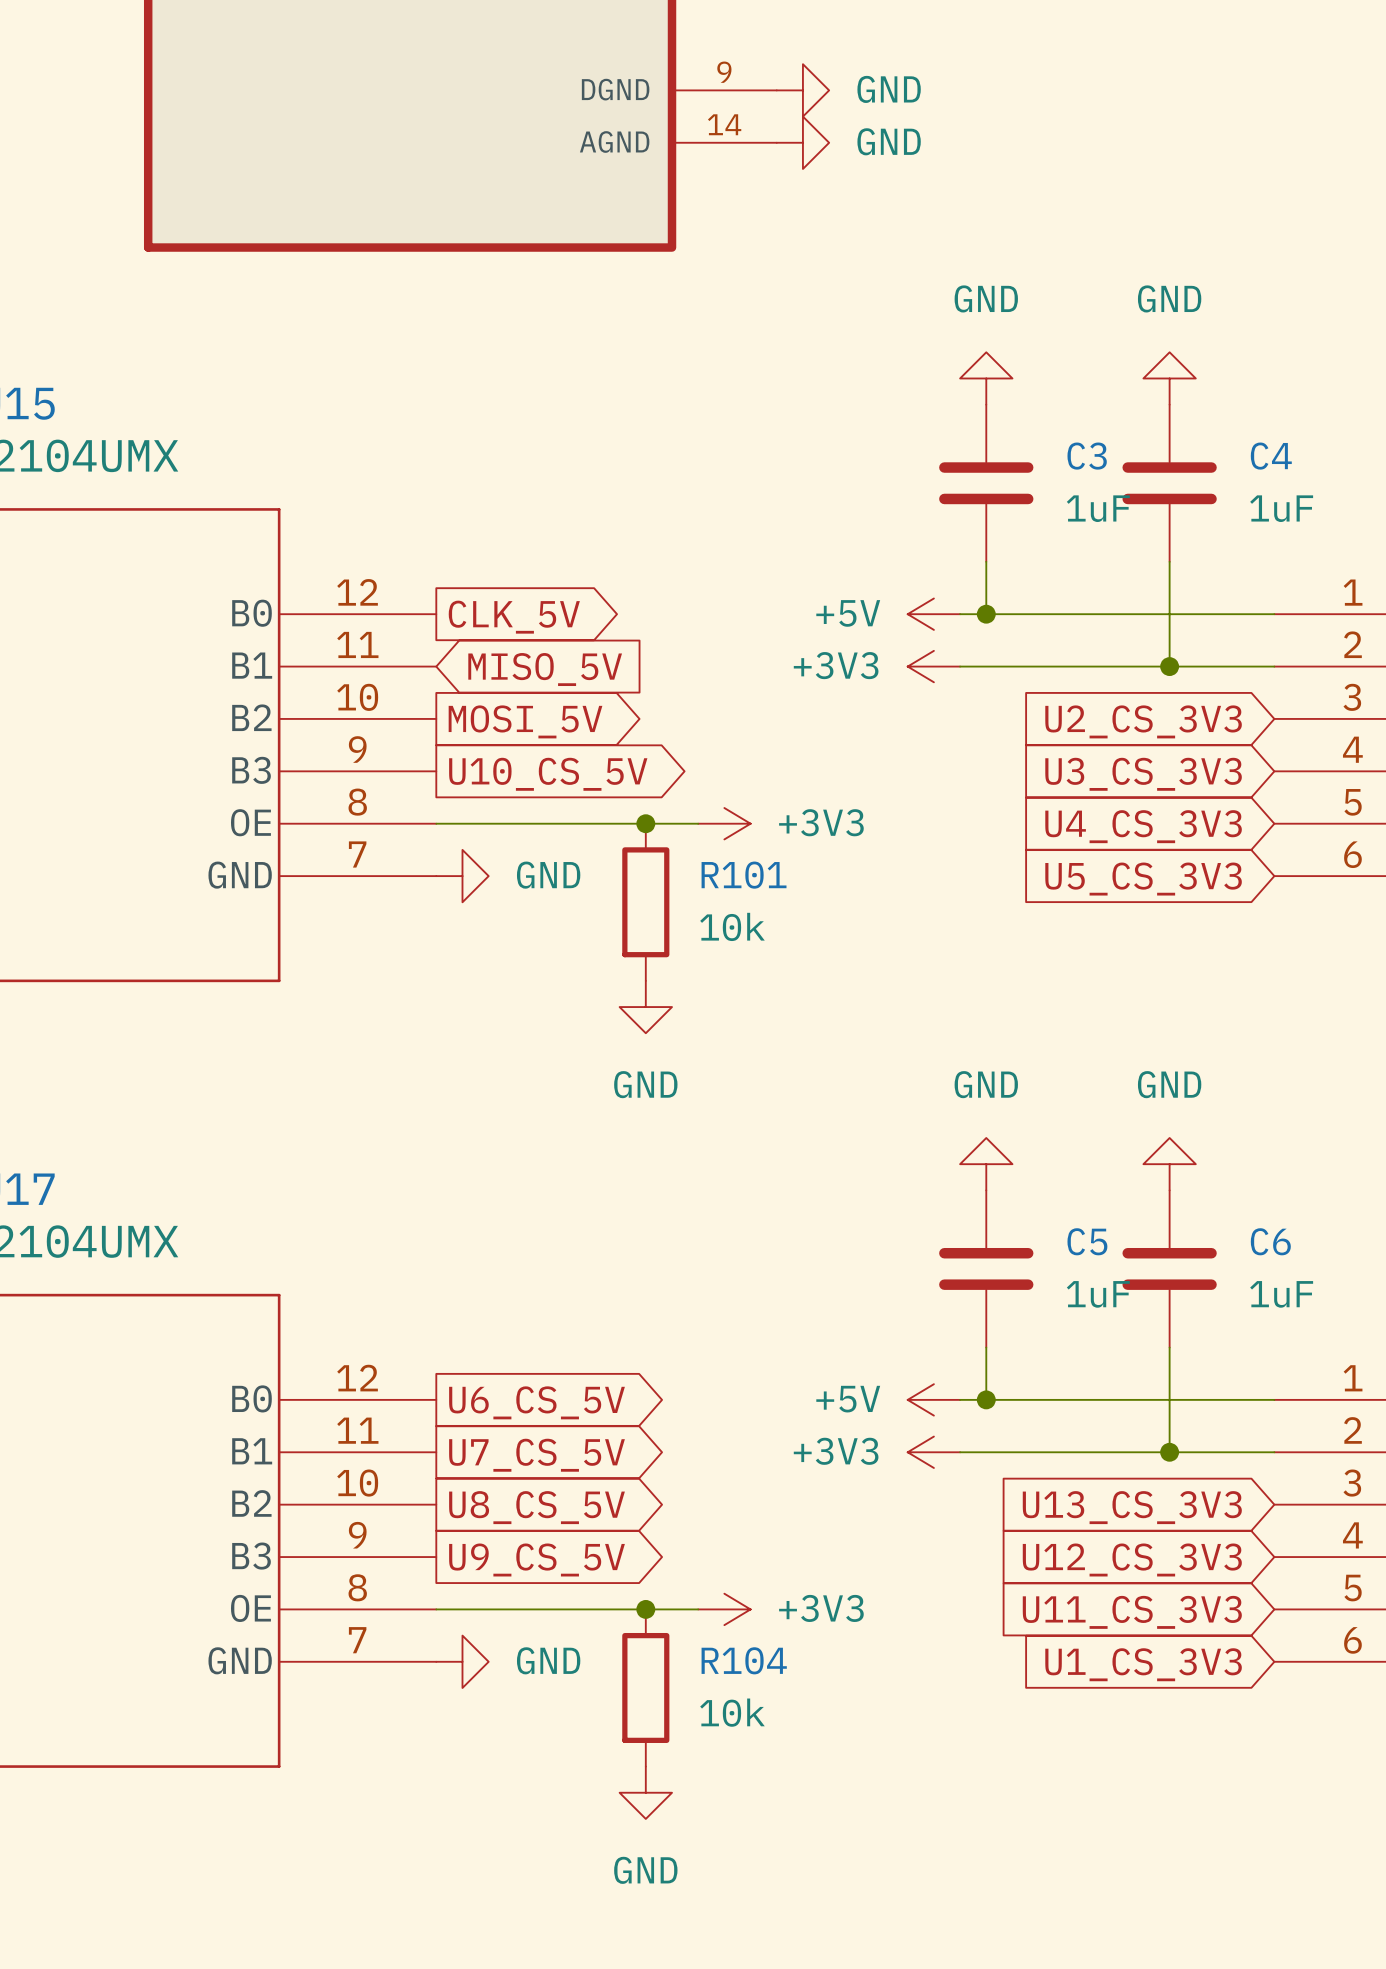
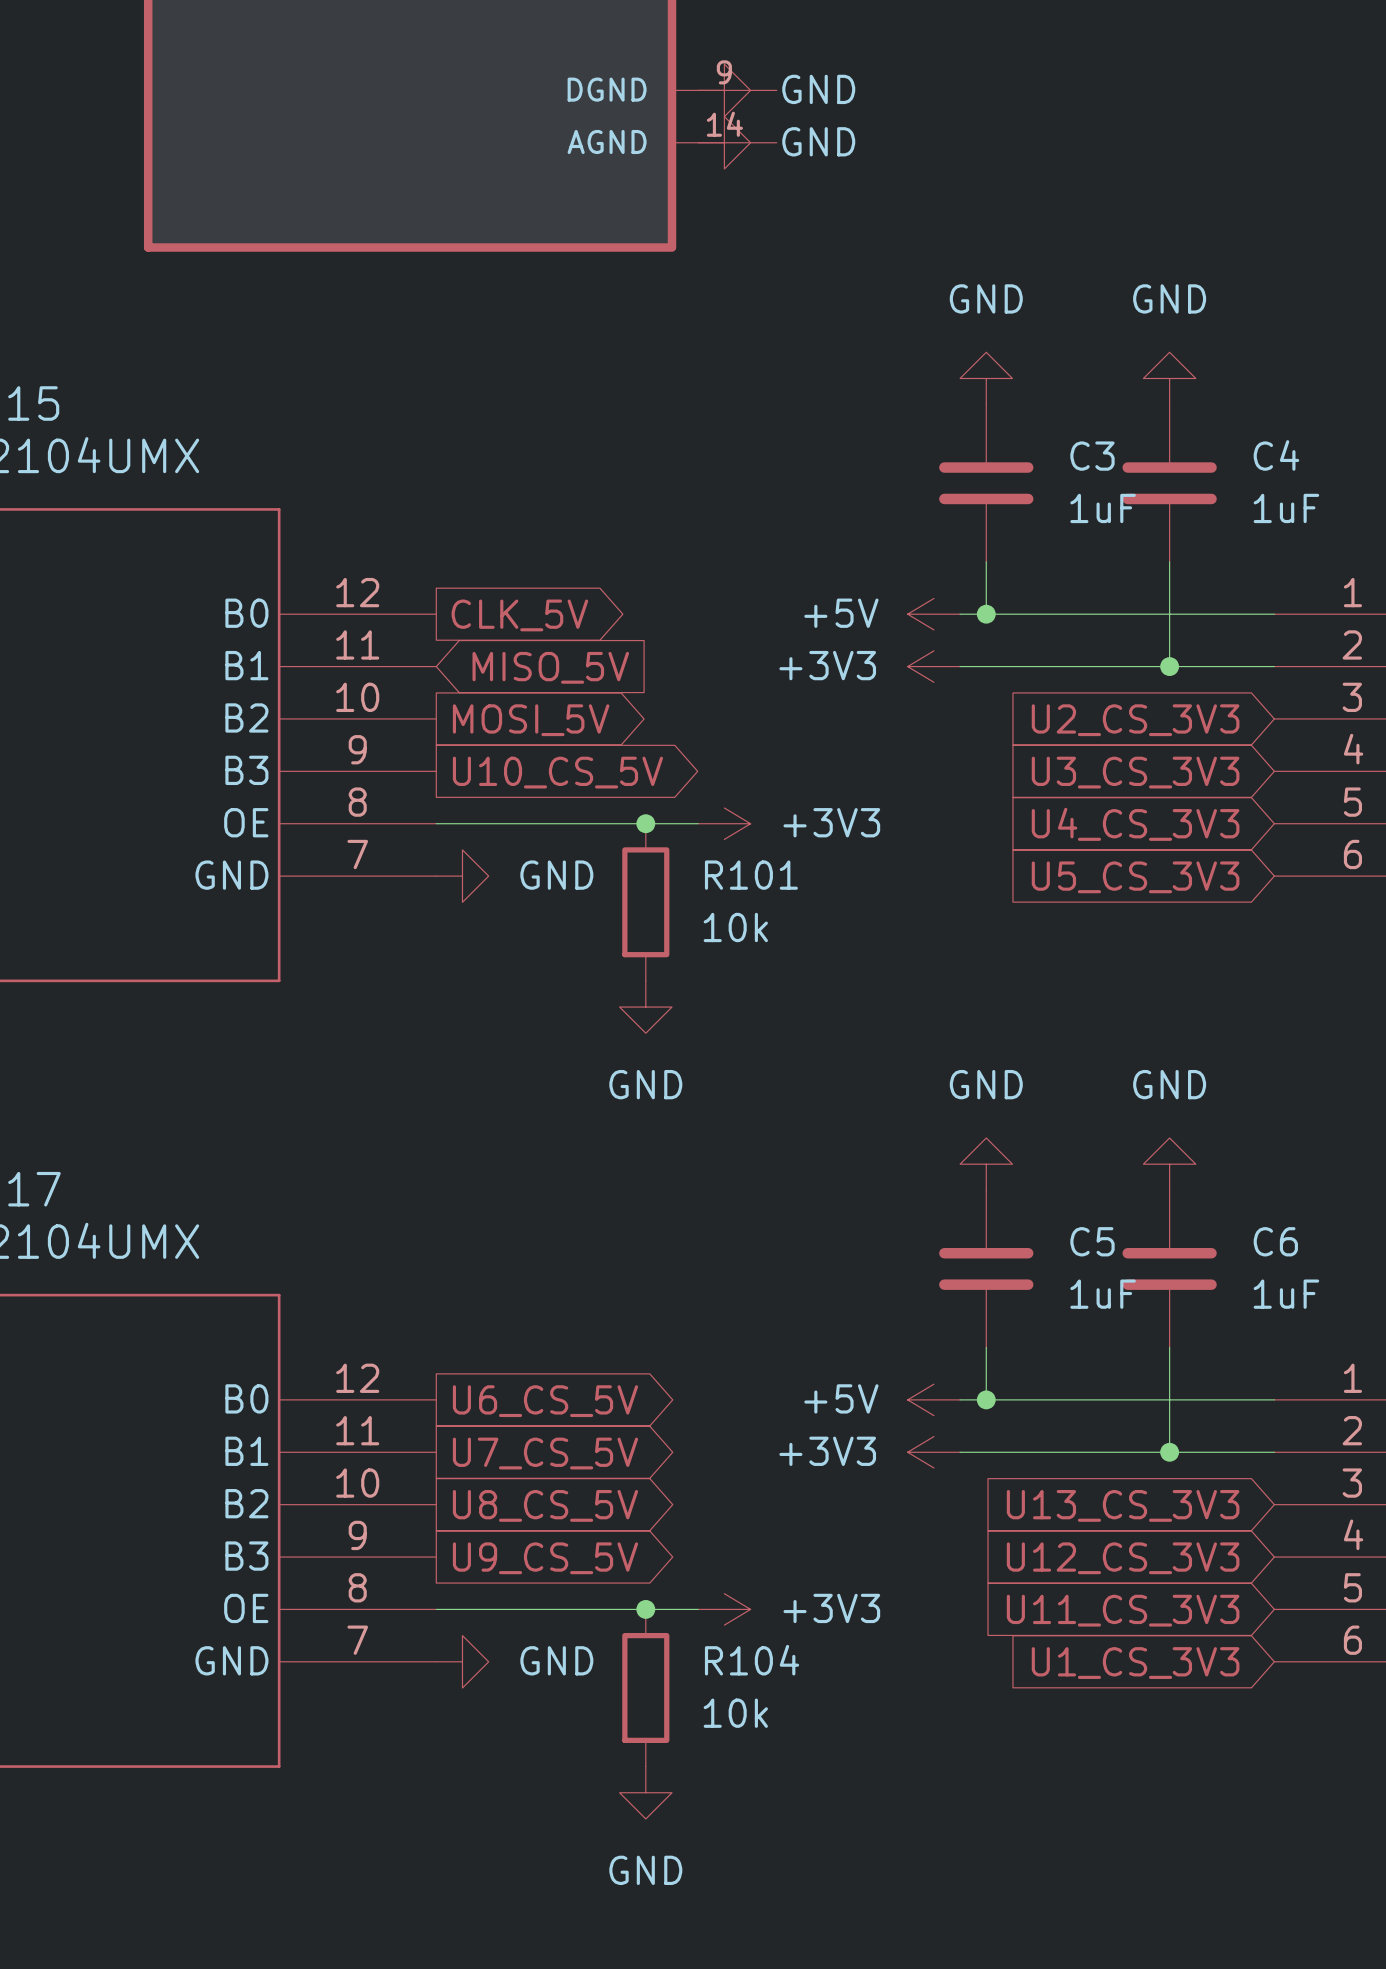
power symbol: none -> GND (724, 90)
power symbol: GND (802, 90) -> none
power symbol: none -> GND (724, 142)
power symbol: GND (802, 142) -> none

